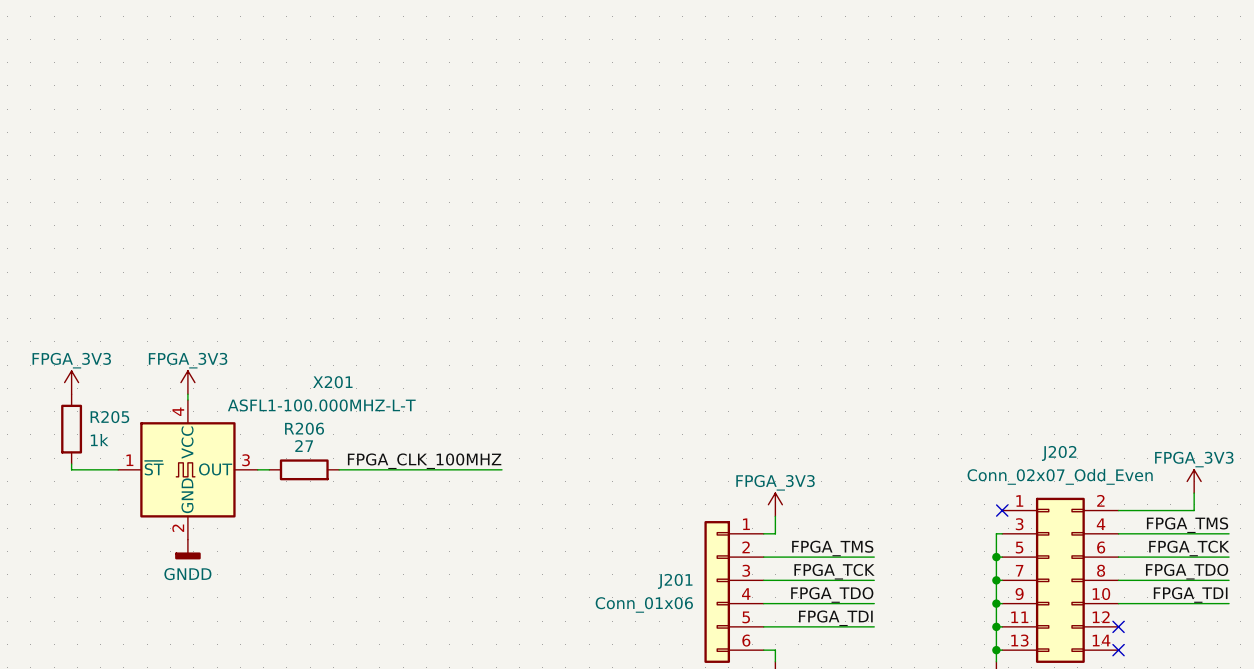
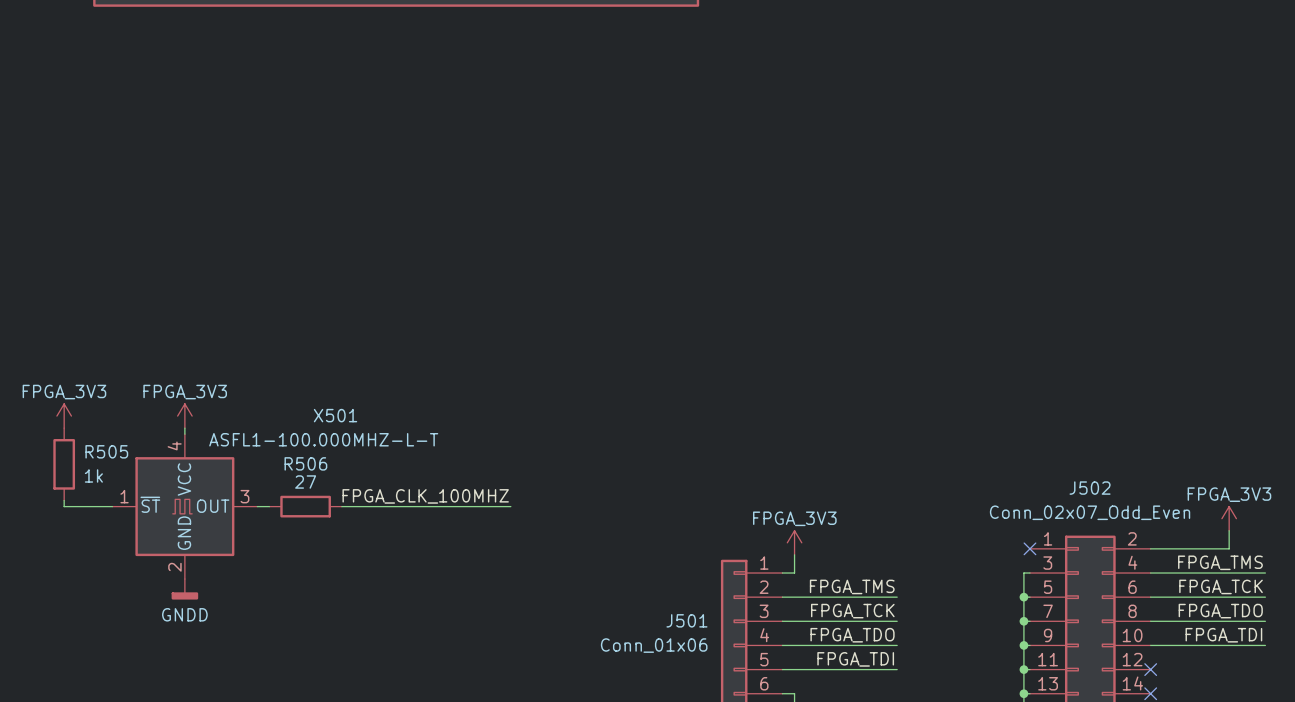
X201 name: X201 (332, 382) -> X501 (335, 415)
R205 name: R205 (109, 417) -> R505 (106, 451)
R206 name: R206 (304, 428) -> R506 (305, 463)
J202 name: J202 (1059, 453) -> J502 (1090, 488)
J201 name: J201 (675, 581) -> J501 (686, 620)

